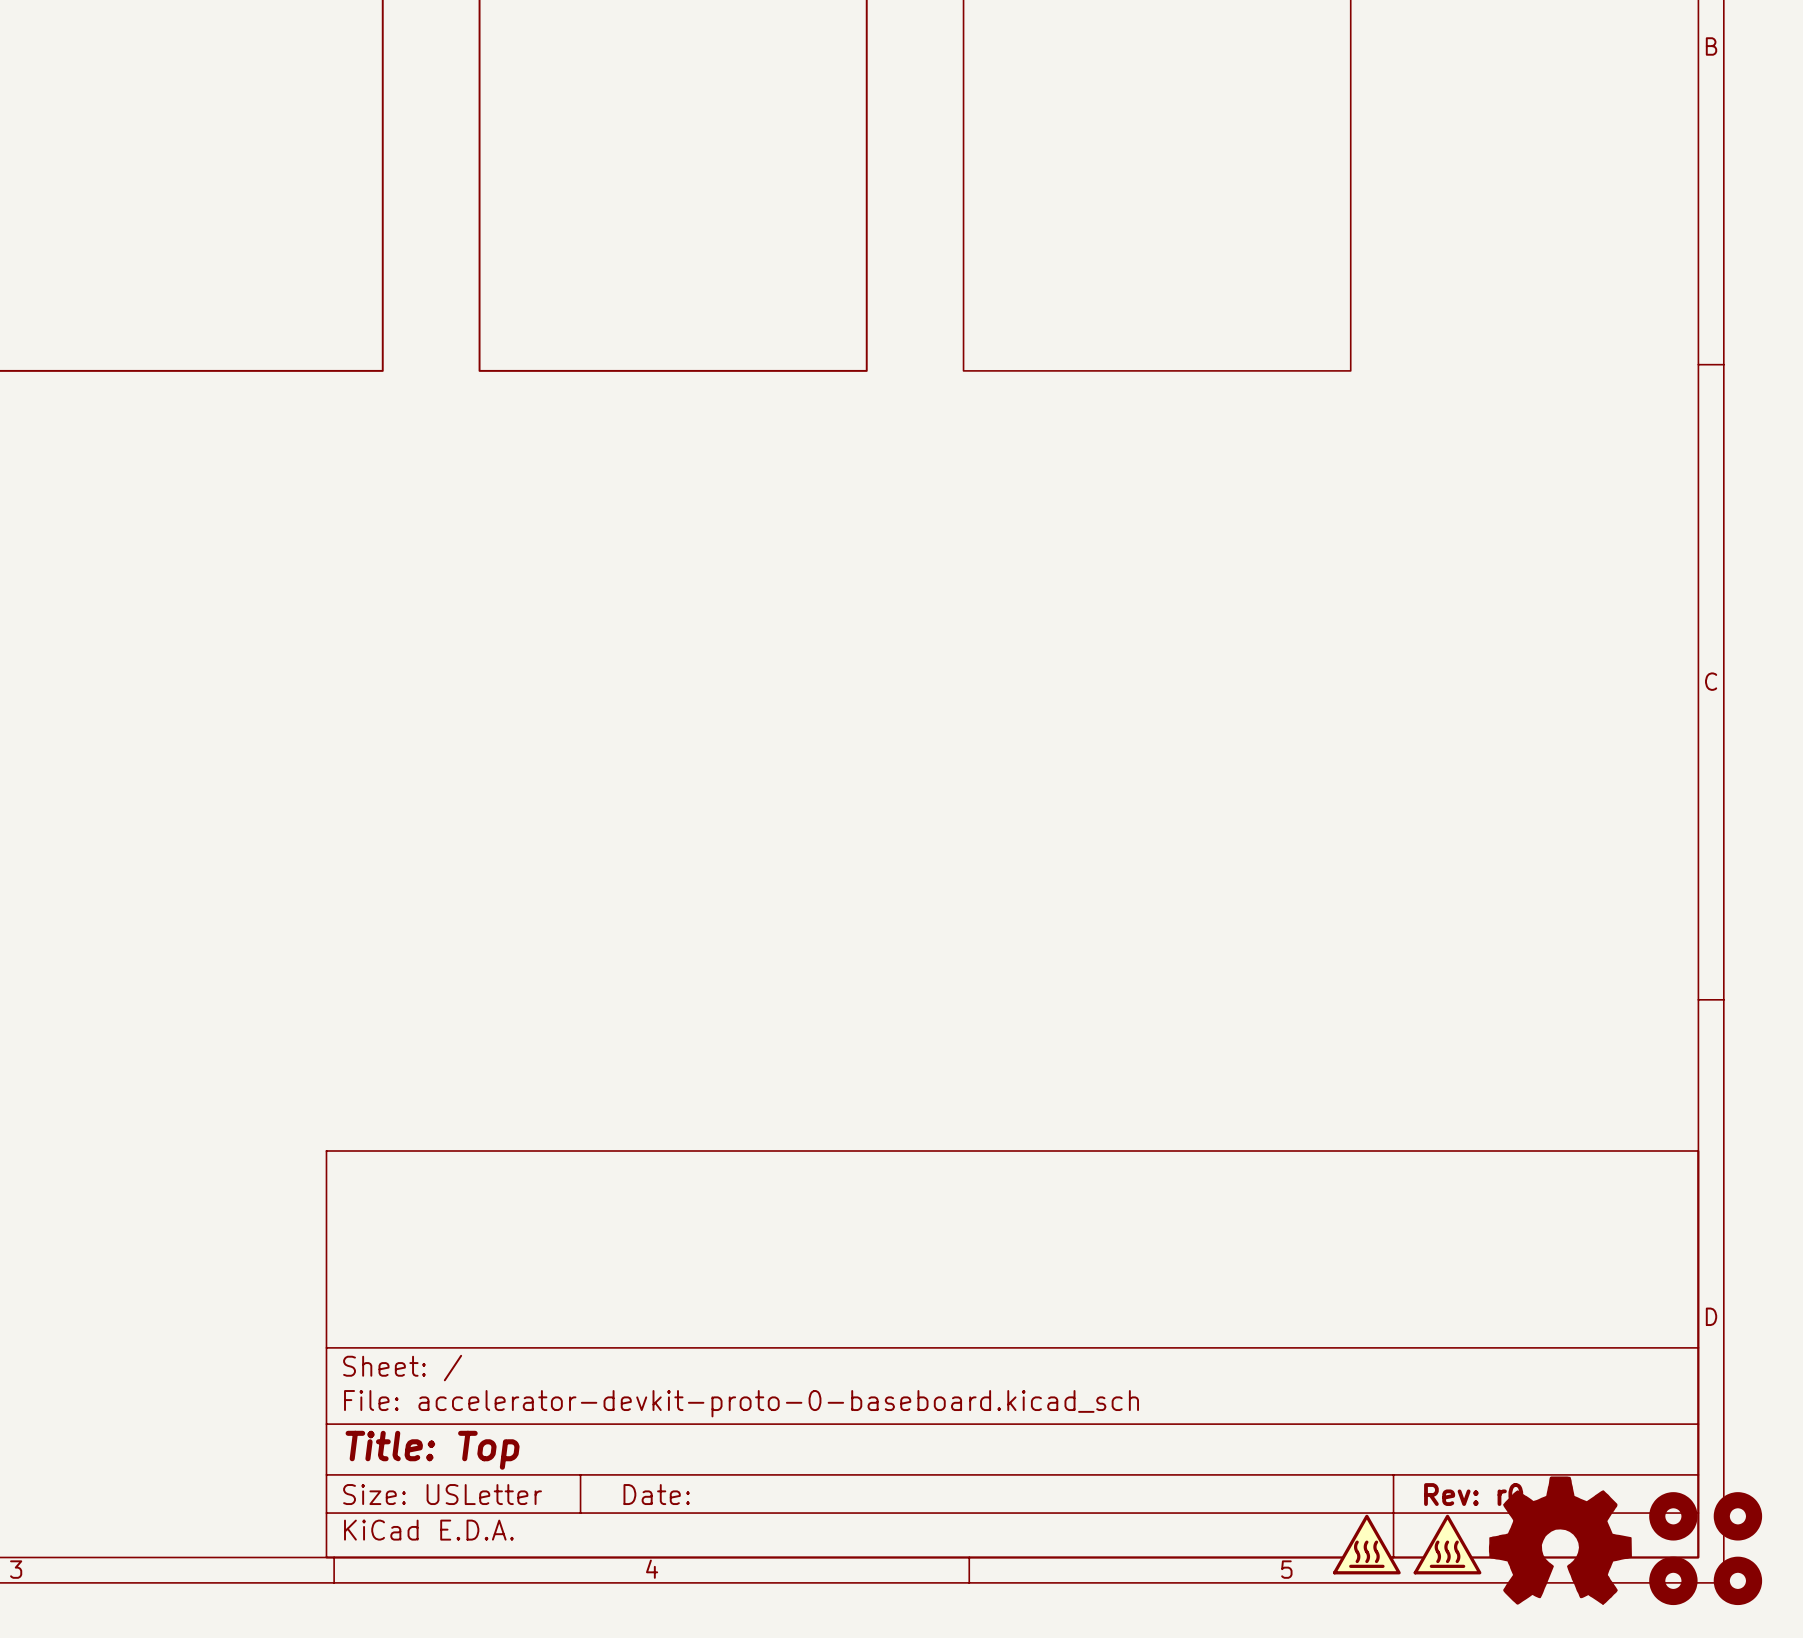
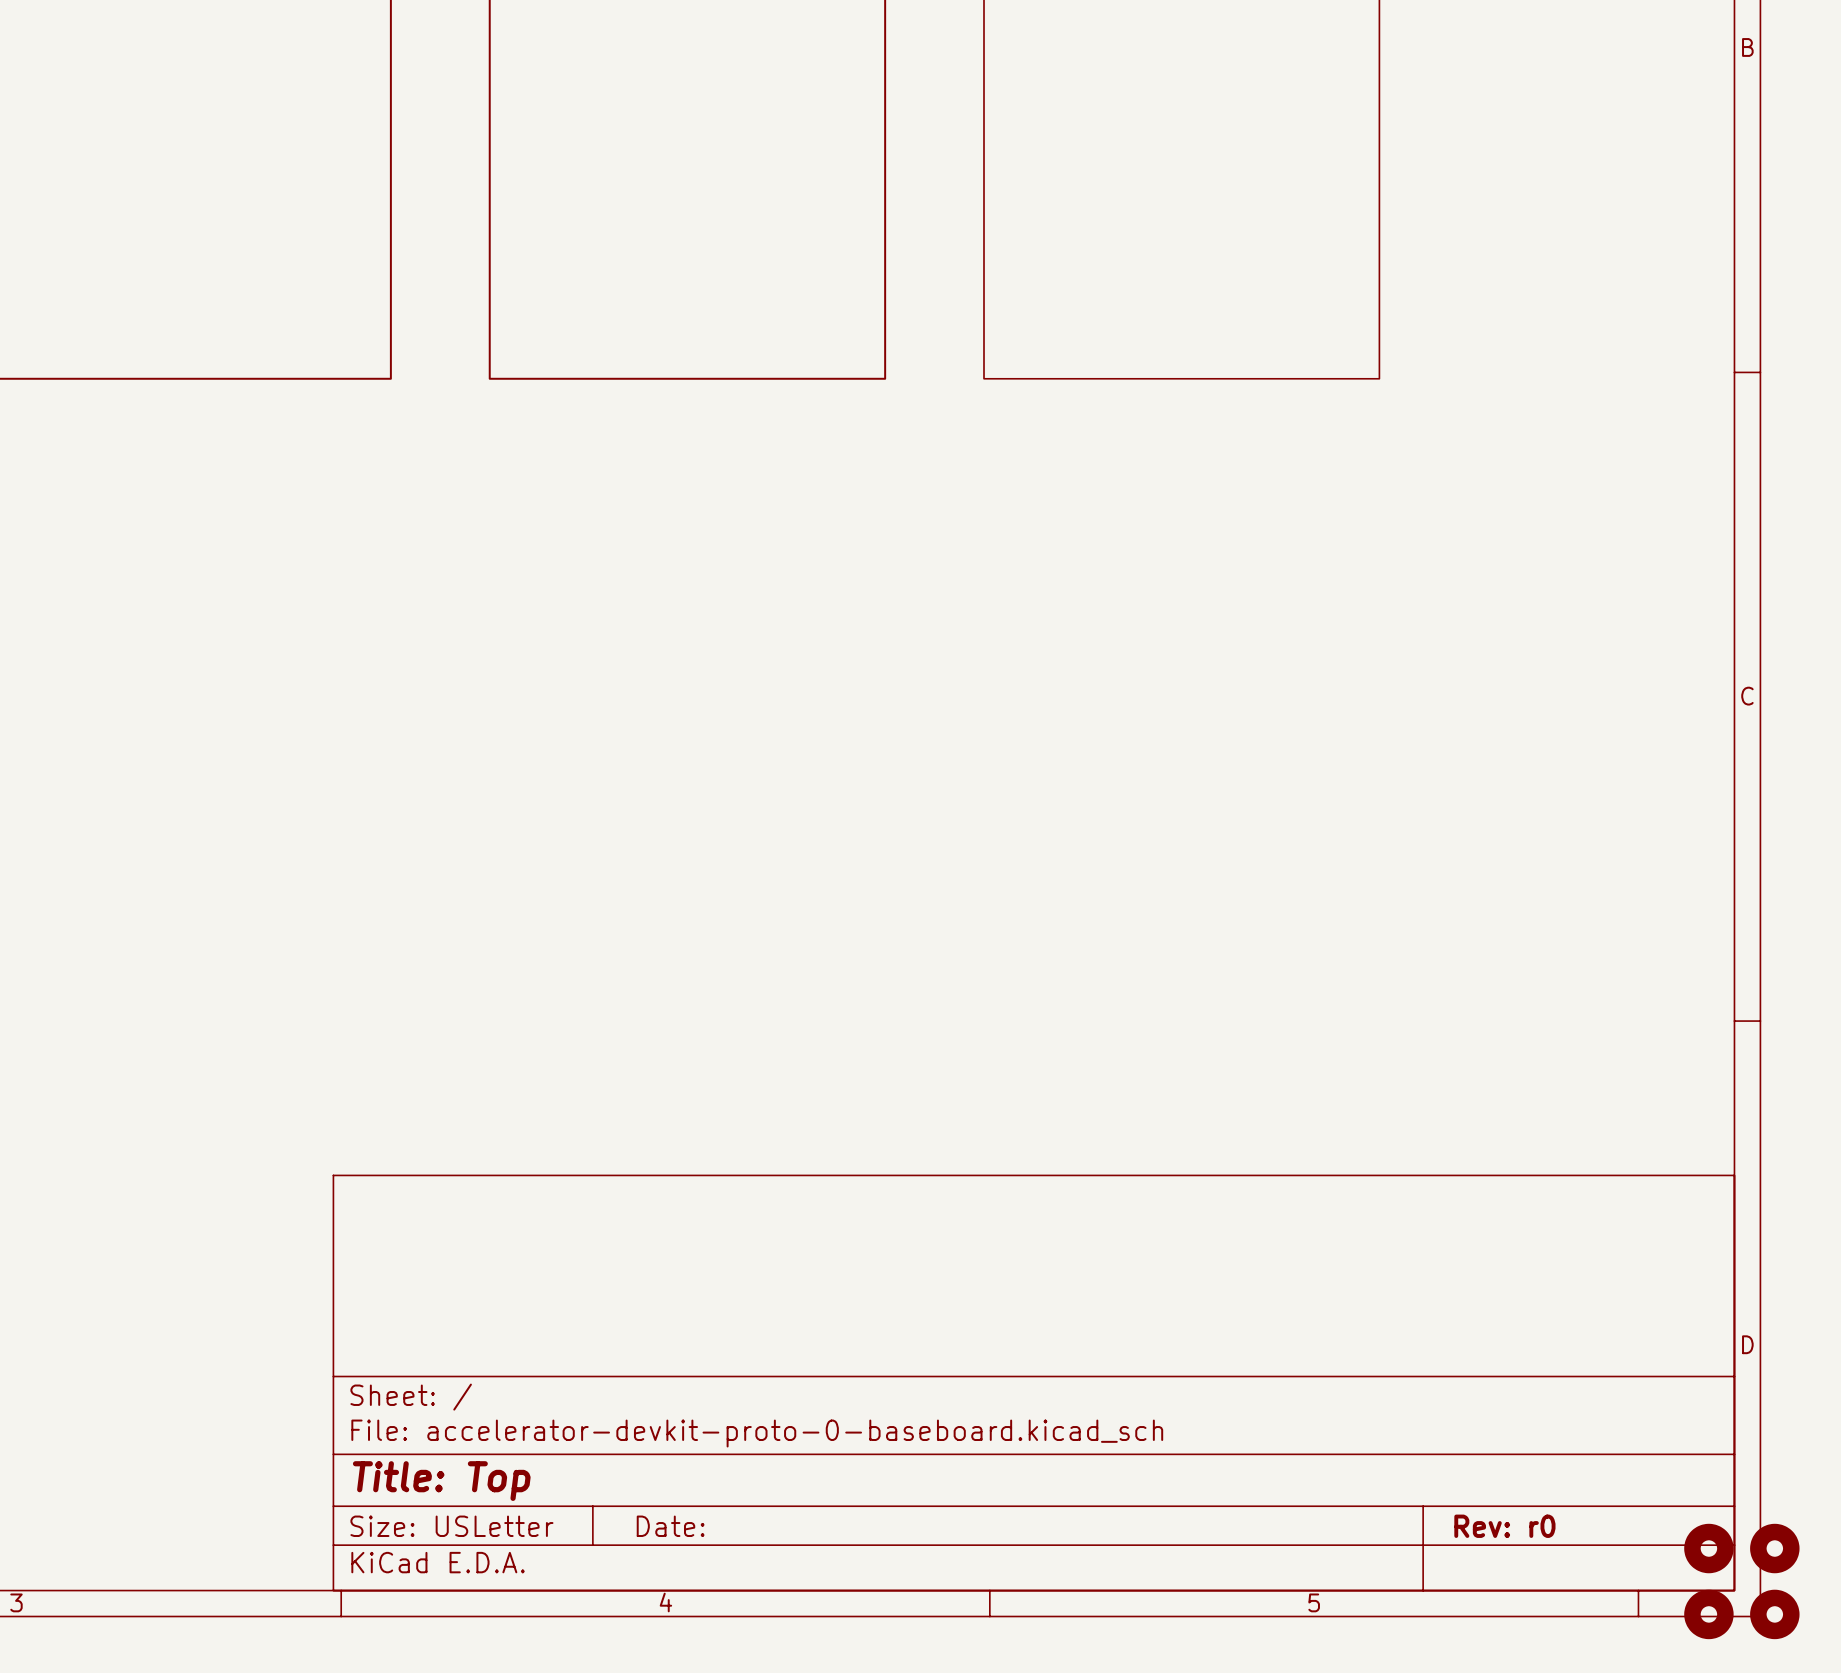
part: (1560, 1540) -> none
part: (1366, 1544) -> none
part: (1447, 1544) -> none

